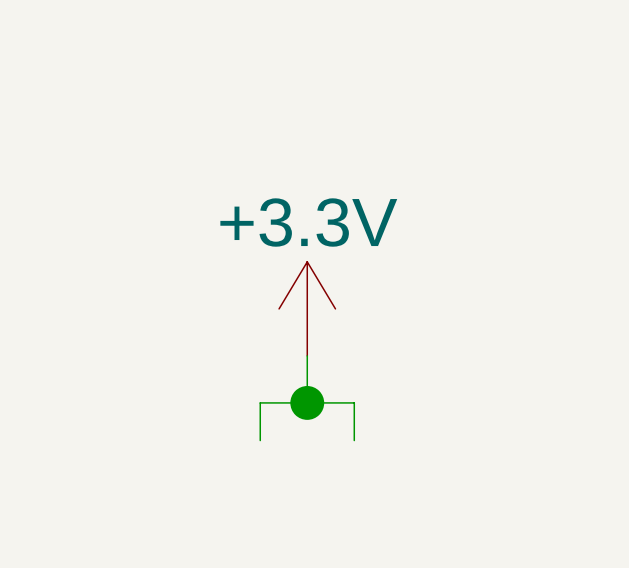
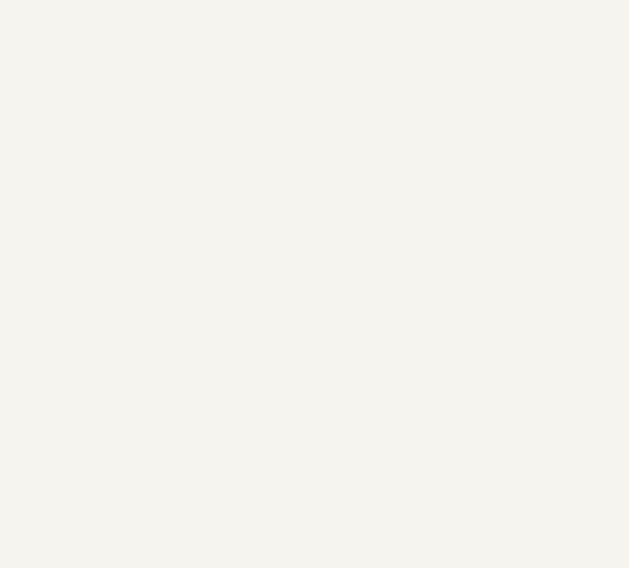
power symbol: +3.3V (307, 308) -> none
wire: (307, 355) (307, 402) -> none
junction: (307, 402) -> none
wire: (260, 440) (260, 402) (354, 402) (354, 440) -> none

